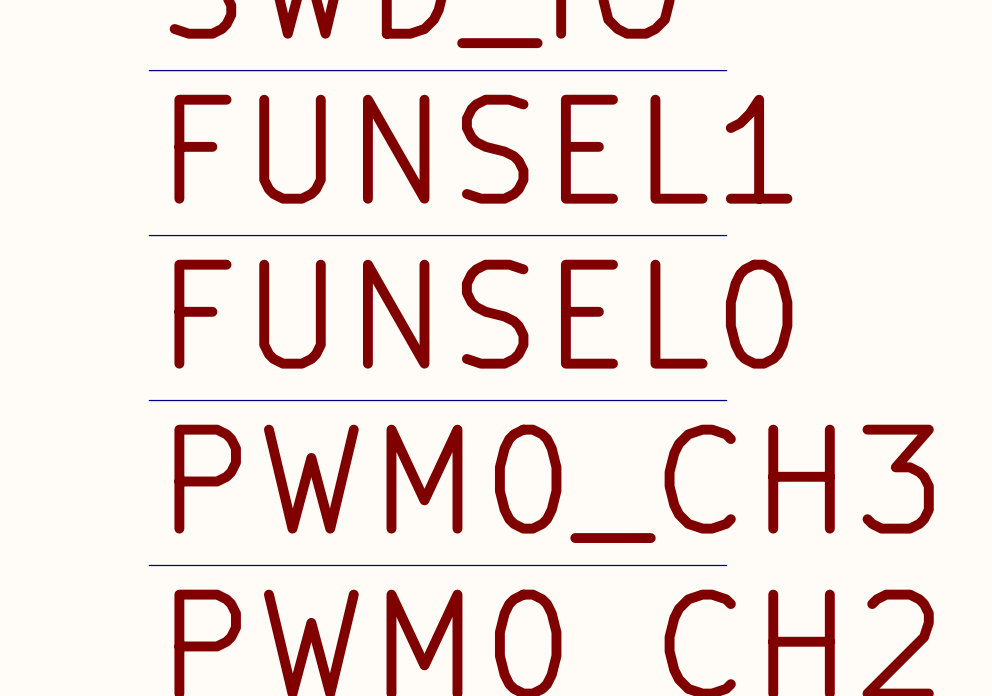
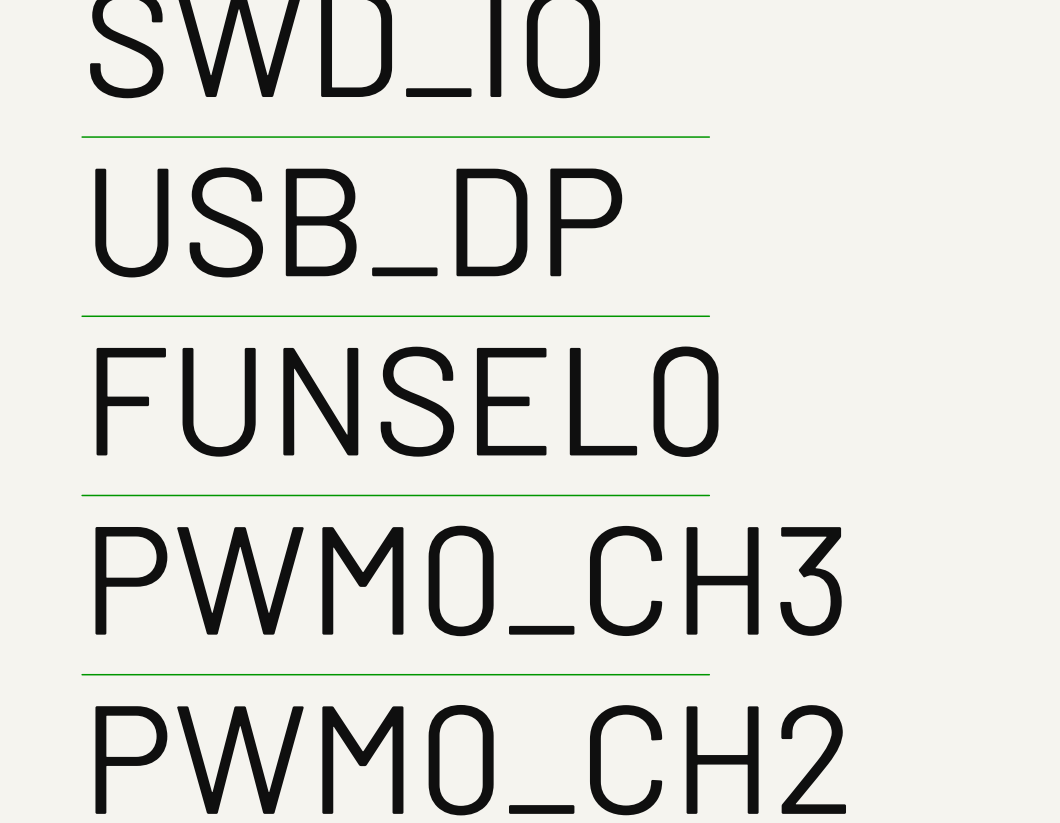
label: FUNSEL1 (483, 149) -> USB_DP (358, 222)

